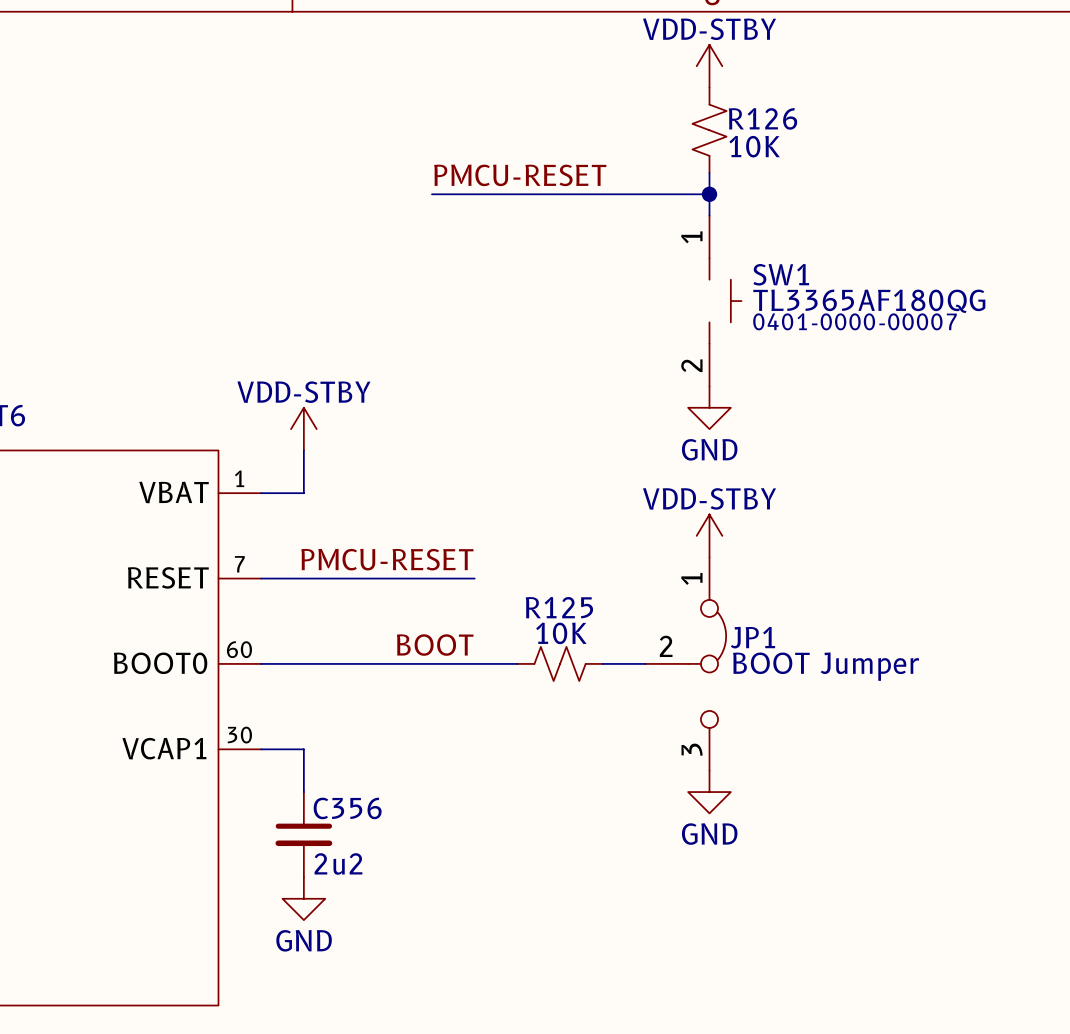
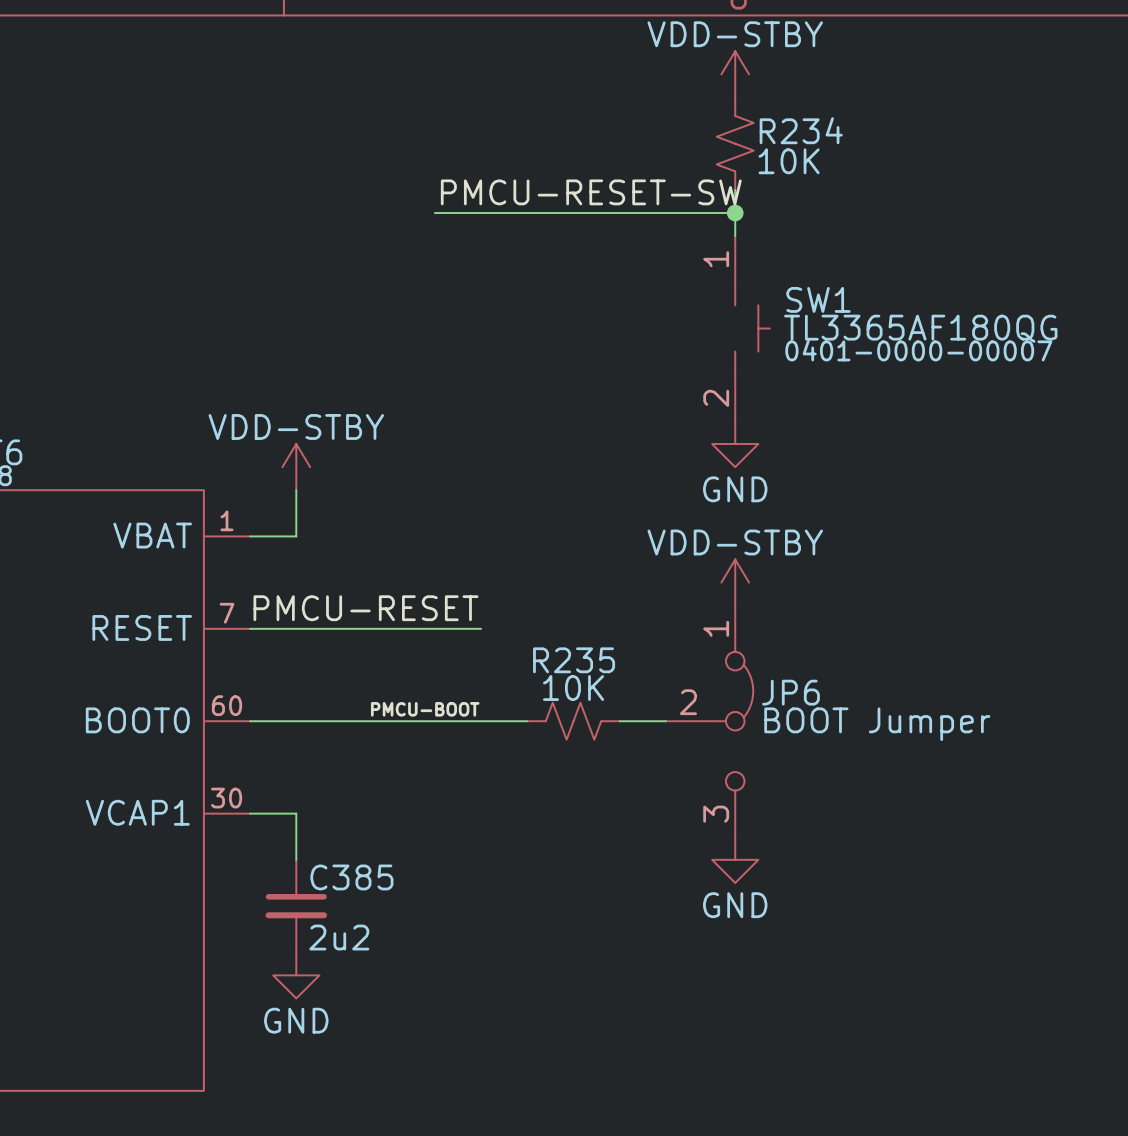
R126 name: R126 (762, 118) -> R234 (801, 130)
label: PMCU-RESET (520, 175) -> PMCU-RESET-SW (591, 192)
R125 name: R125 (559, 607) -> R235 (574, 660)
JP1 name: JP1 (752, 637) -> JP6 (790, 692)
label: BOOT (435, 645) -> PMCU-BOOT (425, 709)
C356 name: C356 (347, 808) -> C385 (351, 877)

